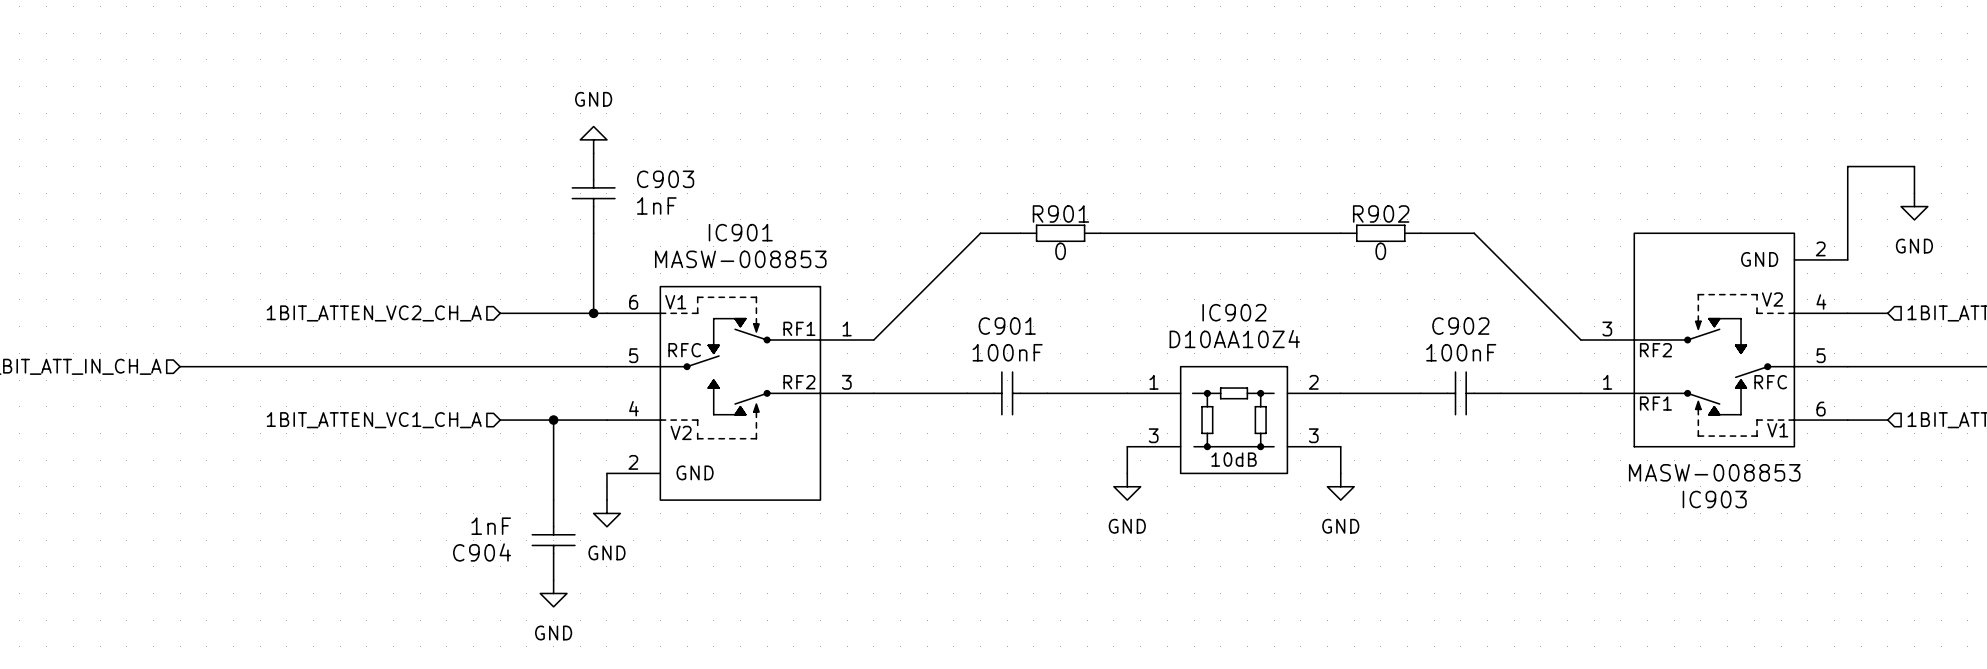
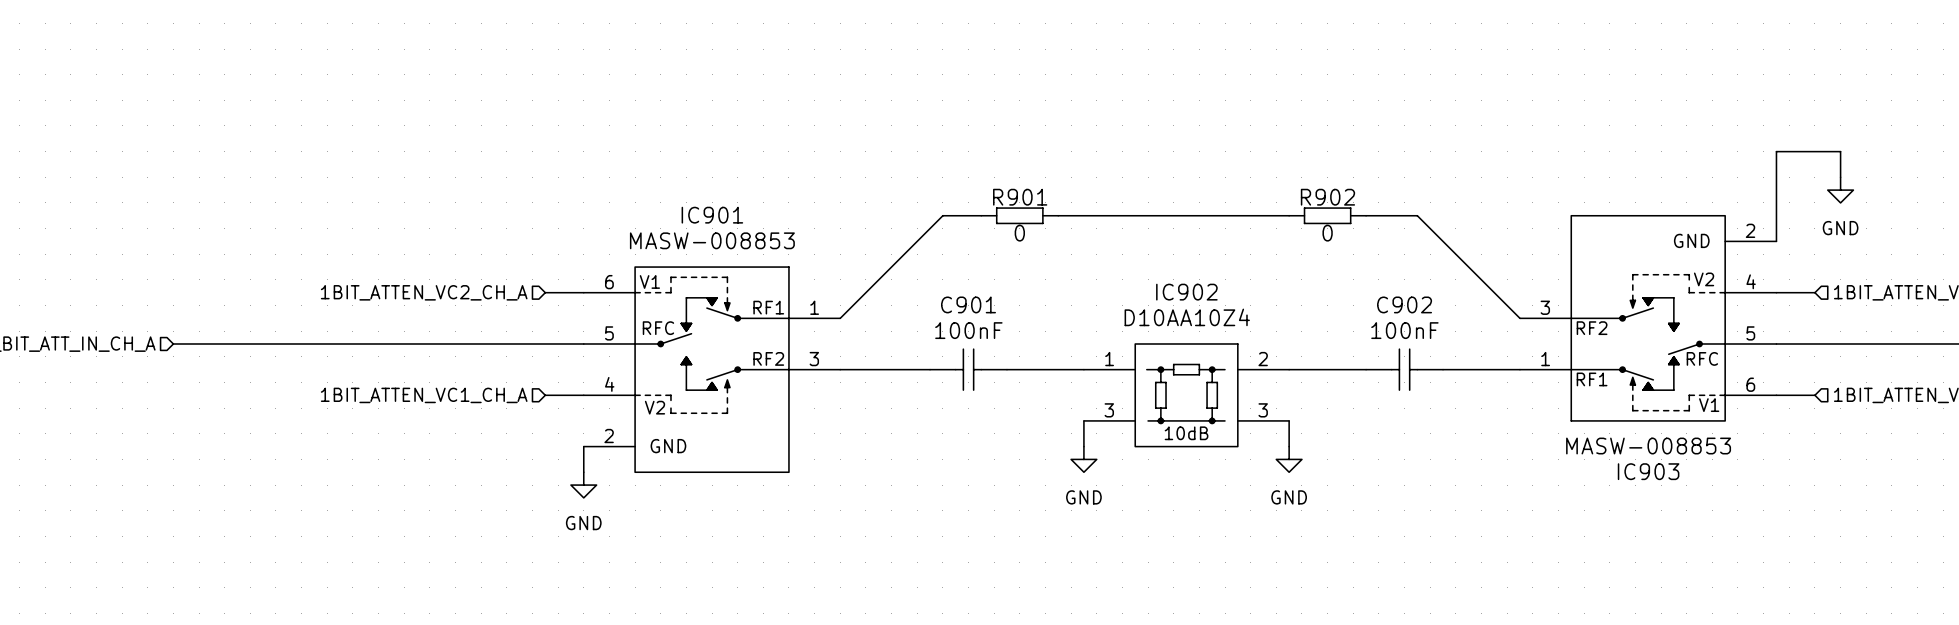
power symbol: GND (593, 139) -> none
C903: 1nF (593, 193) -> none
wire: (593, 233) (593, 313) -> none
hierarchical label position: 1BIT_ATTEN_VC2_CH_A (374, 313) -> 1BIT_ATTEN_VC2_CH_A (424, 292)
wire: (500, 313) (566, 313) -> none
junction: (593, 313) -> none
hierarchical label position: 1BIT_ATTEN_VC1_CH_A (374, 420) -> 1BIT_ATTEN_VC1_CH_A (424, 395)
wire: (500, 420) (566, 420) -> none
wire: (553, 420) (553, 500) -> none
junction: (553, 420) -> none
C904: 1nF (553, 540) -> none
power symbol: GND (553, 593) -> none

